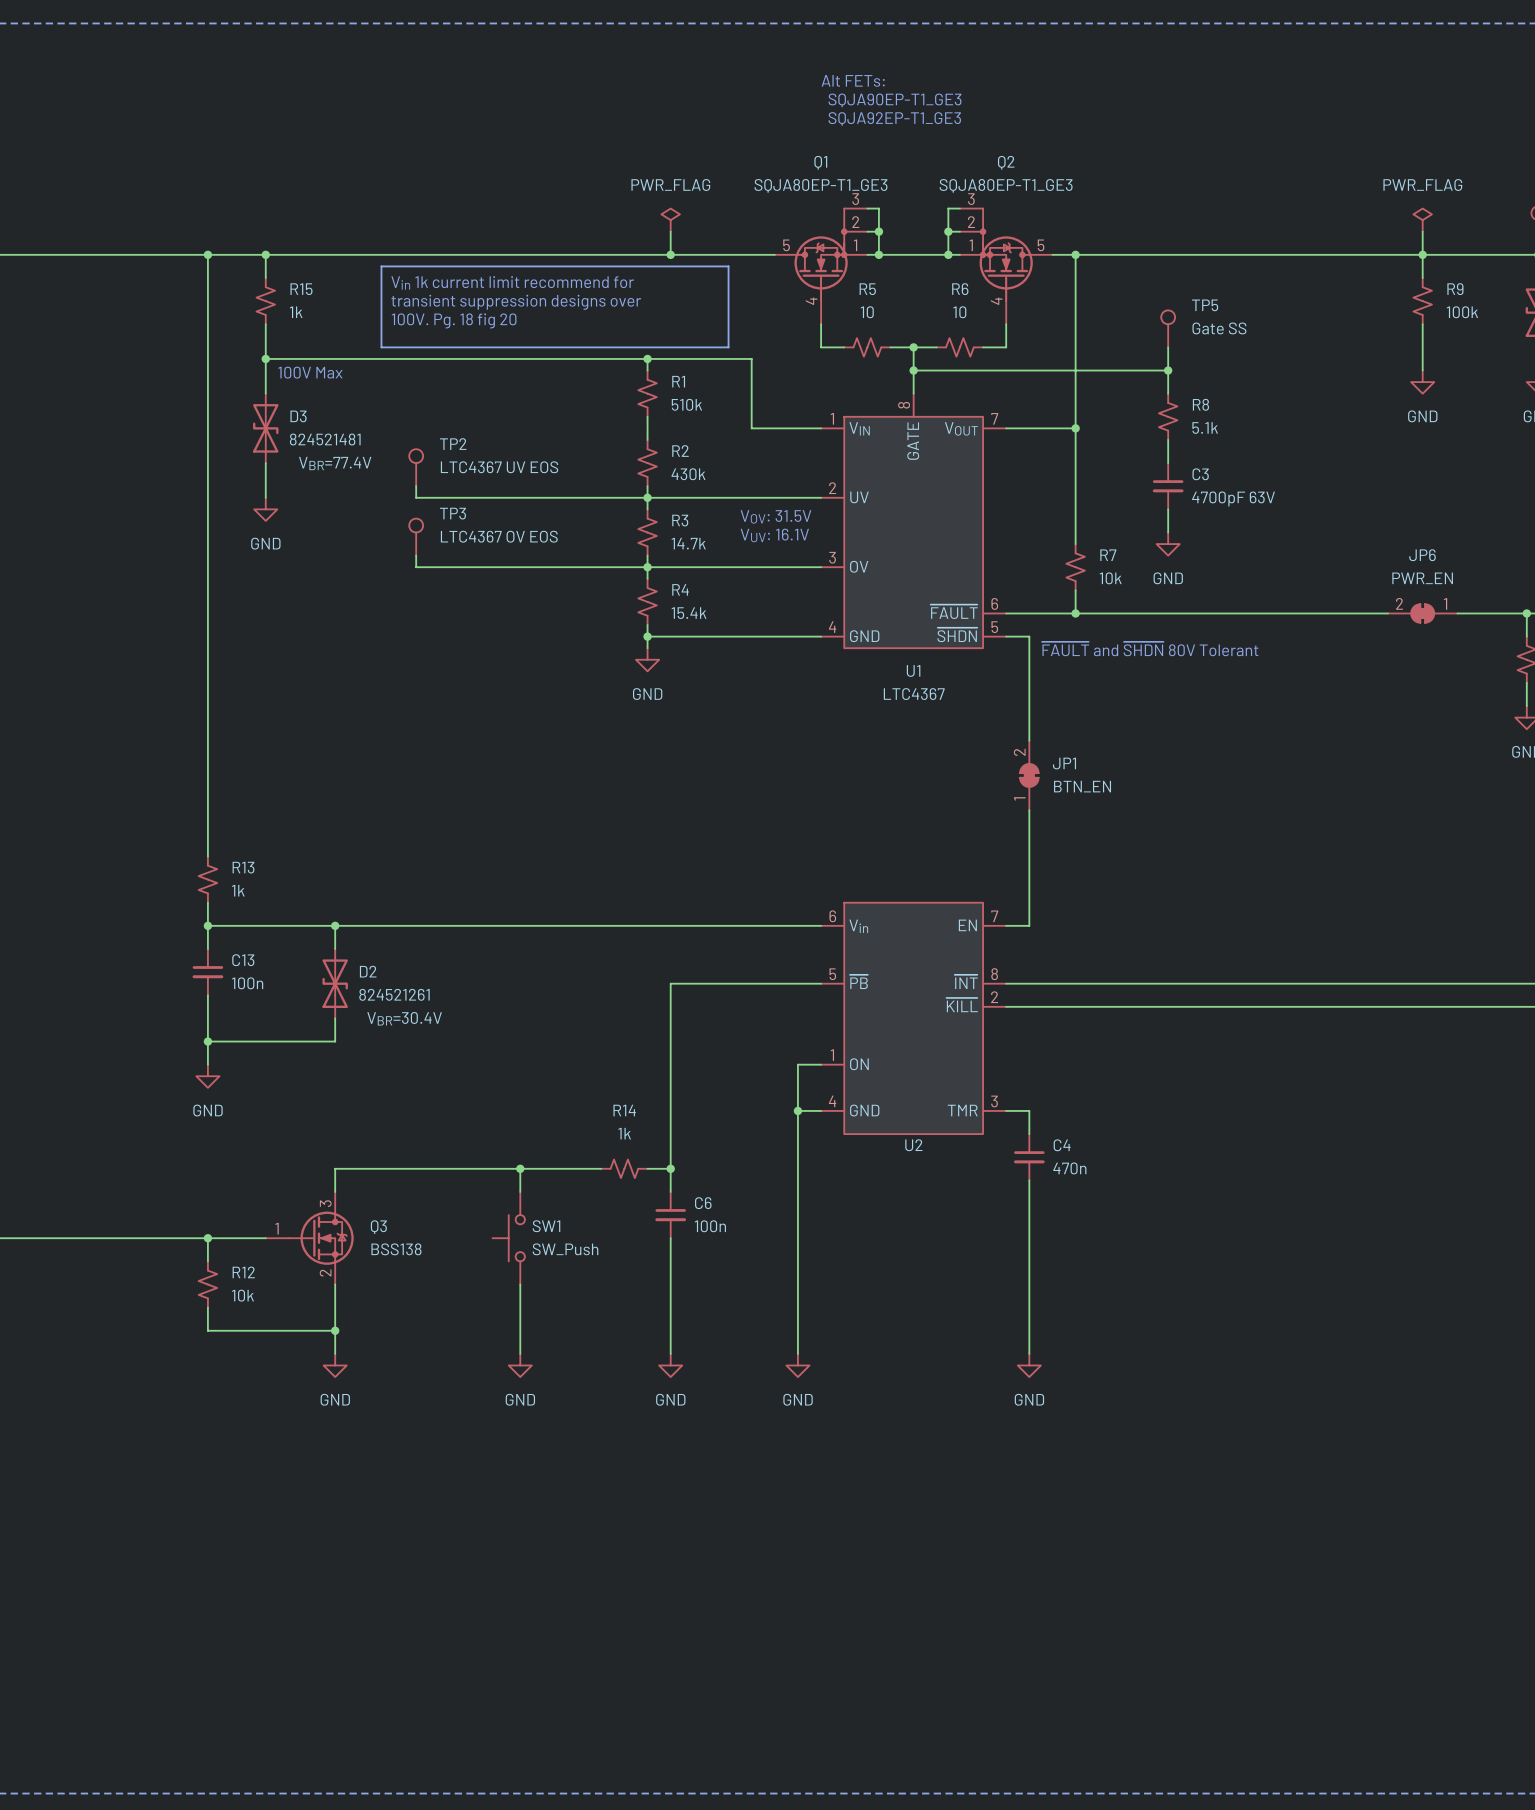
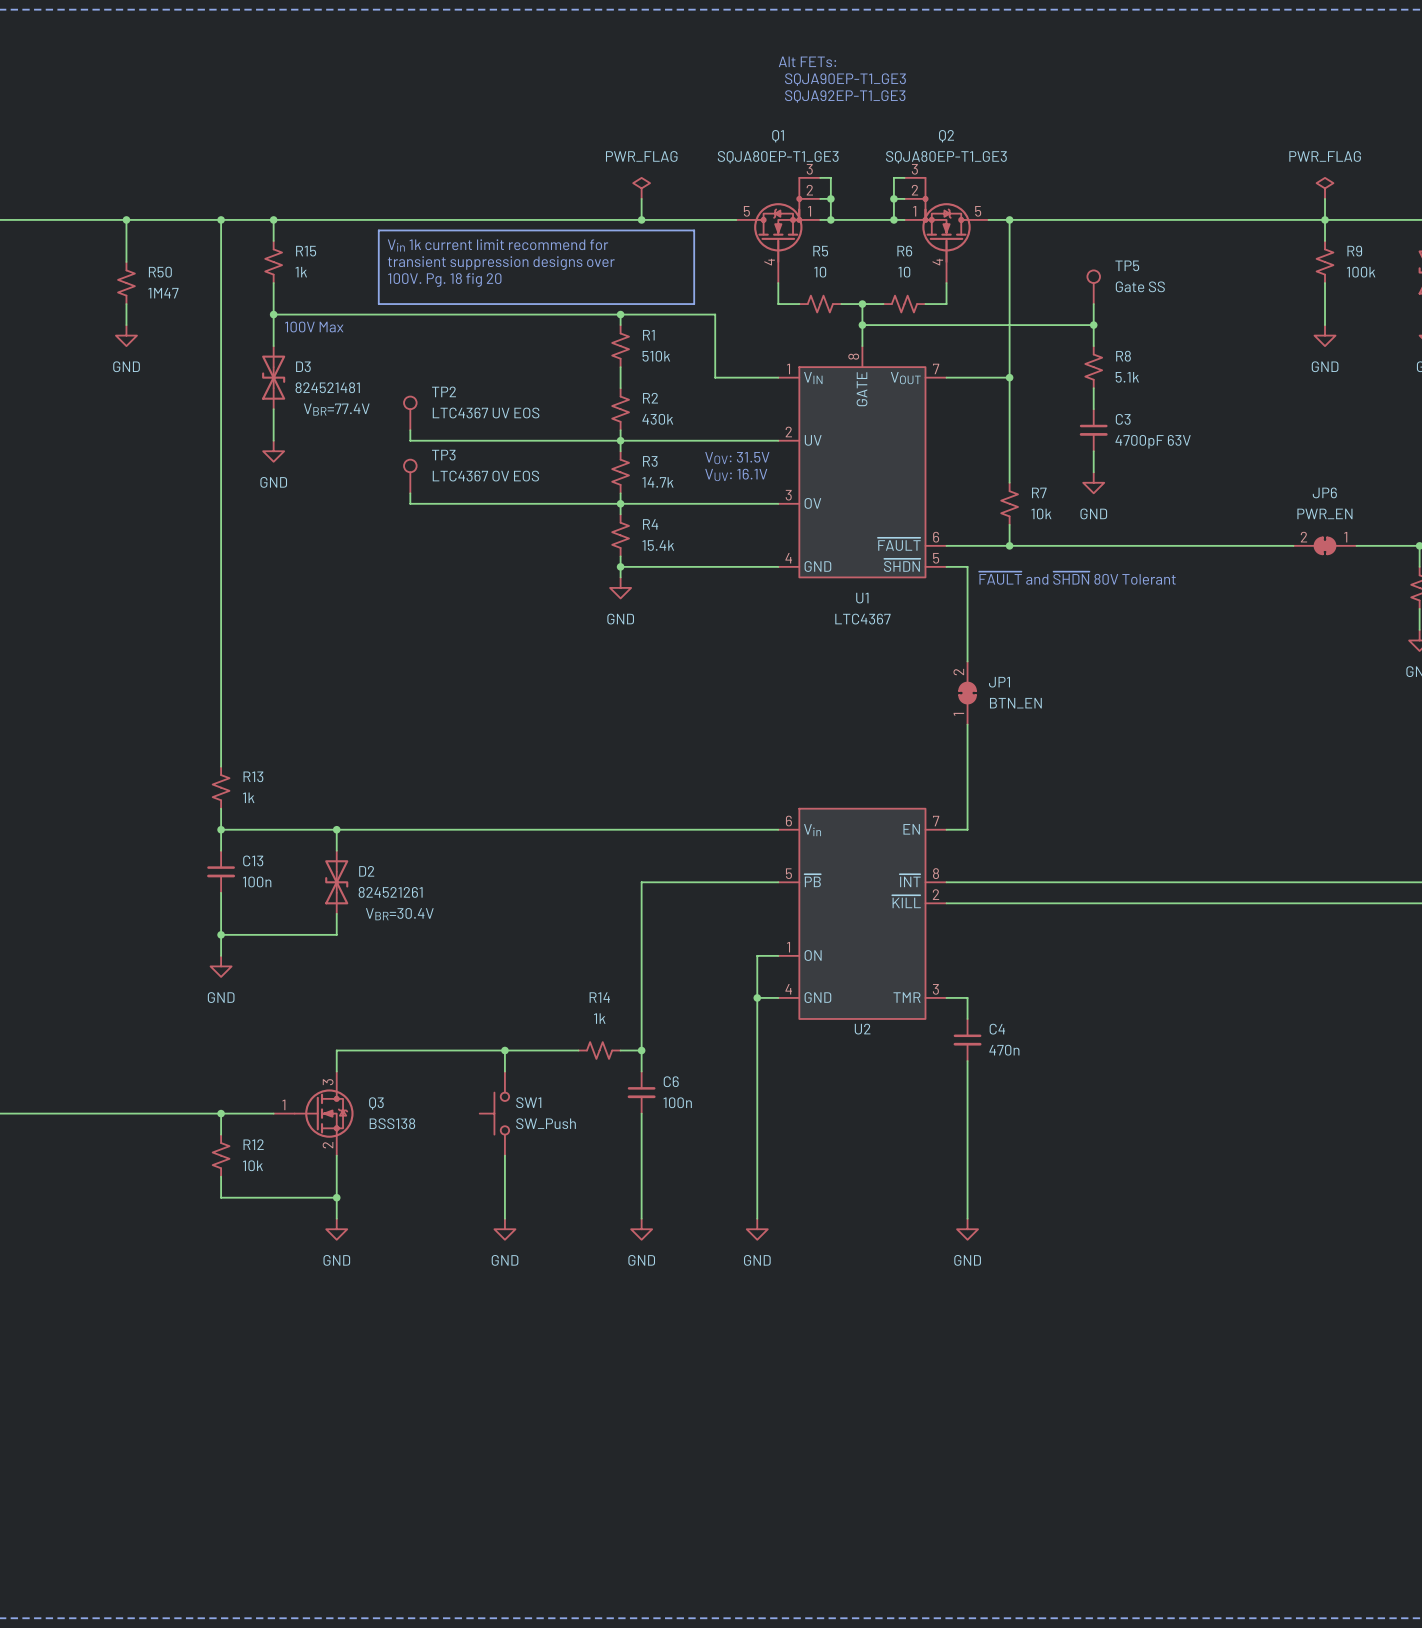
wire: none -> (126, 219) (126, 262)
junction: none -> (126, 219)
R50: none -> 1M47 (126, 283)
wire: none -> (126, 304) (126, 325)
power symbol: none -> GND (126, 335)

